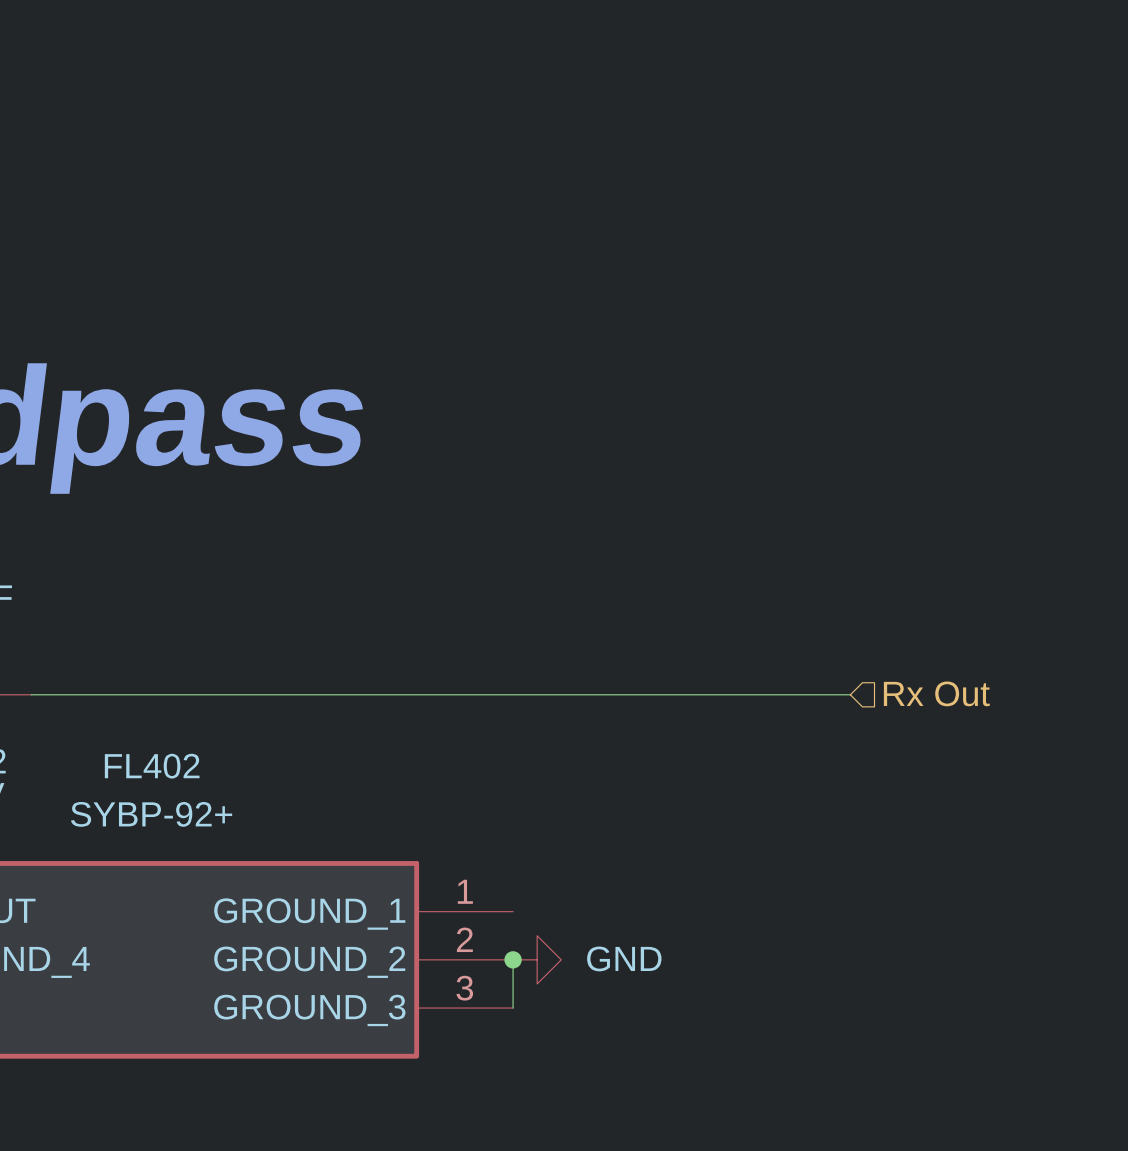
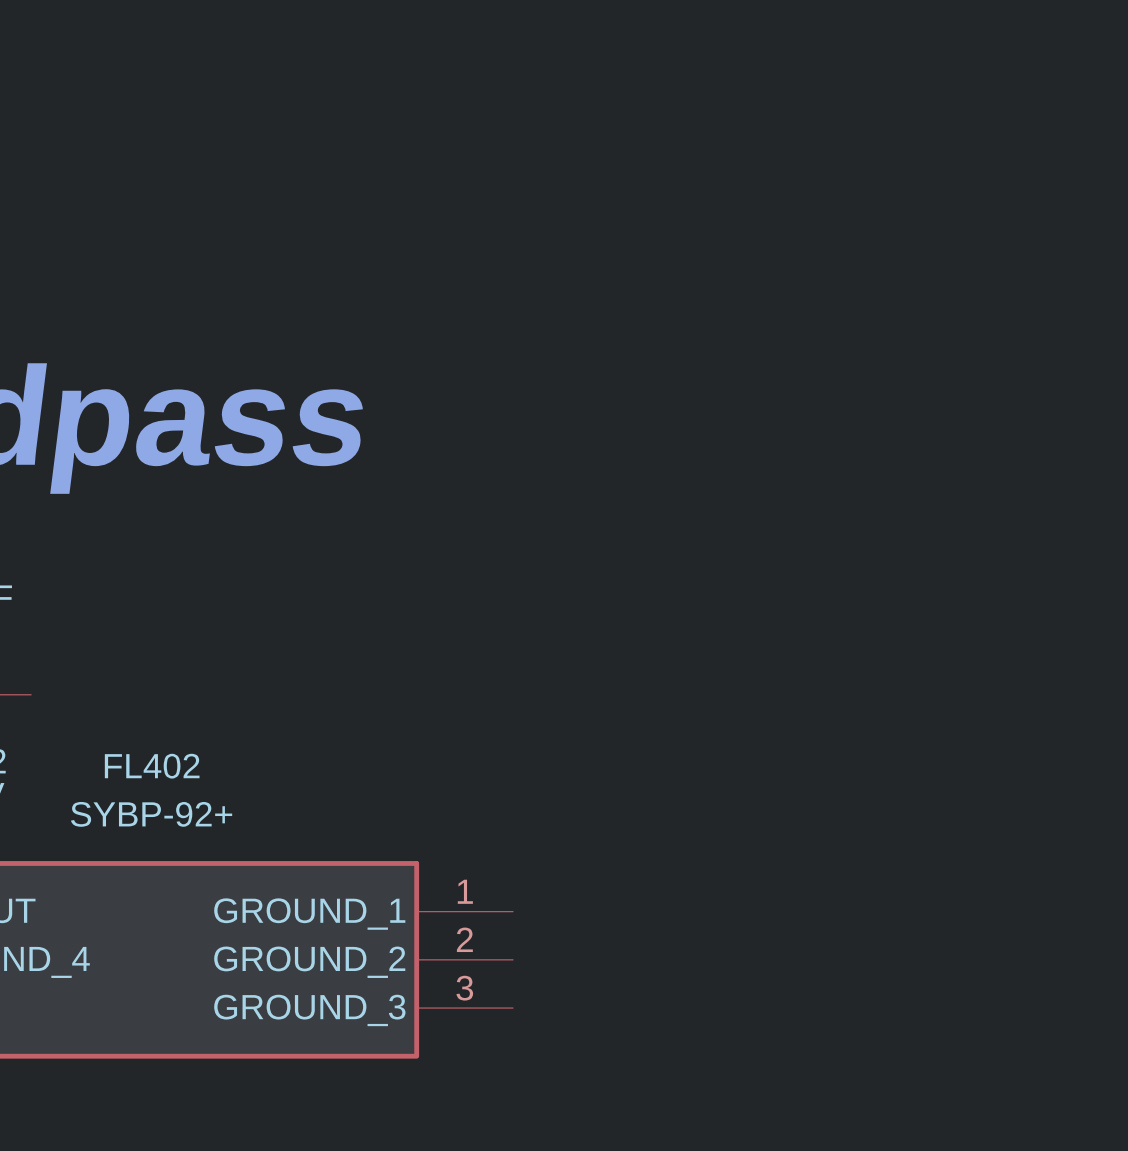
hierarchical label: Rx Out (936, 693) -> none
wire: (31, 694) (850, 694) -> none
wire: (513, 959) (513, 1008) -> none
junction: (513, 959) -> none
power symbol: GND (537, 959) -> none

